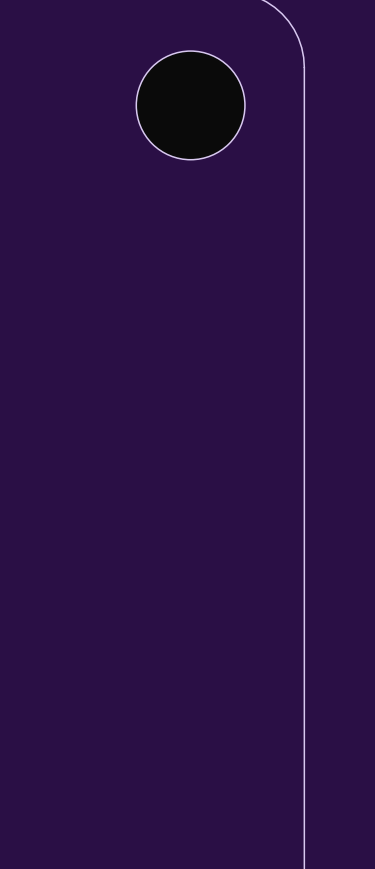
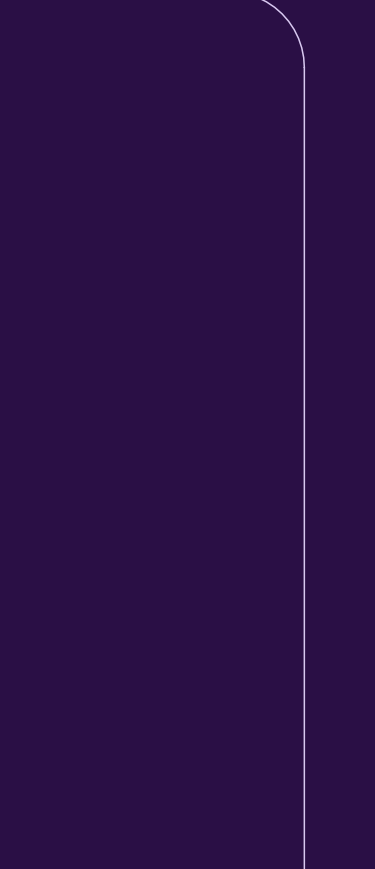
part: (190, 105) -> none

